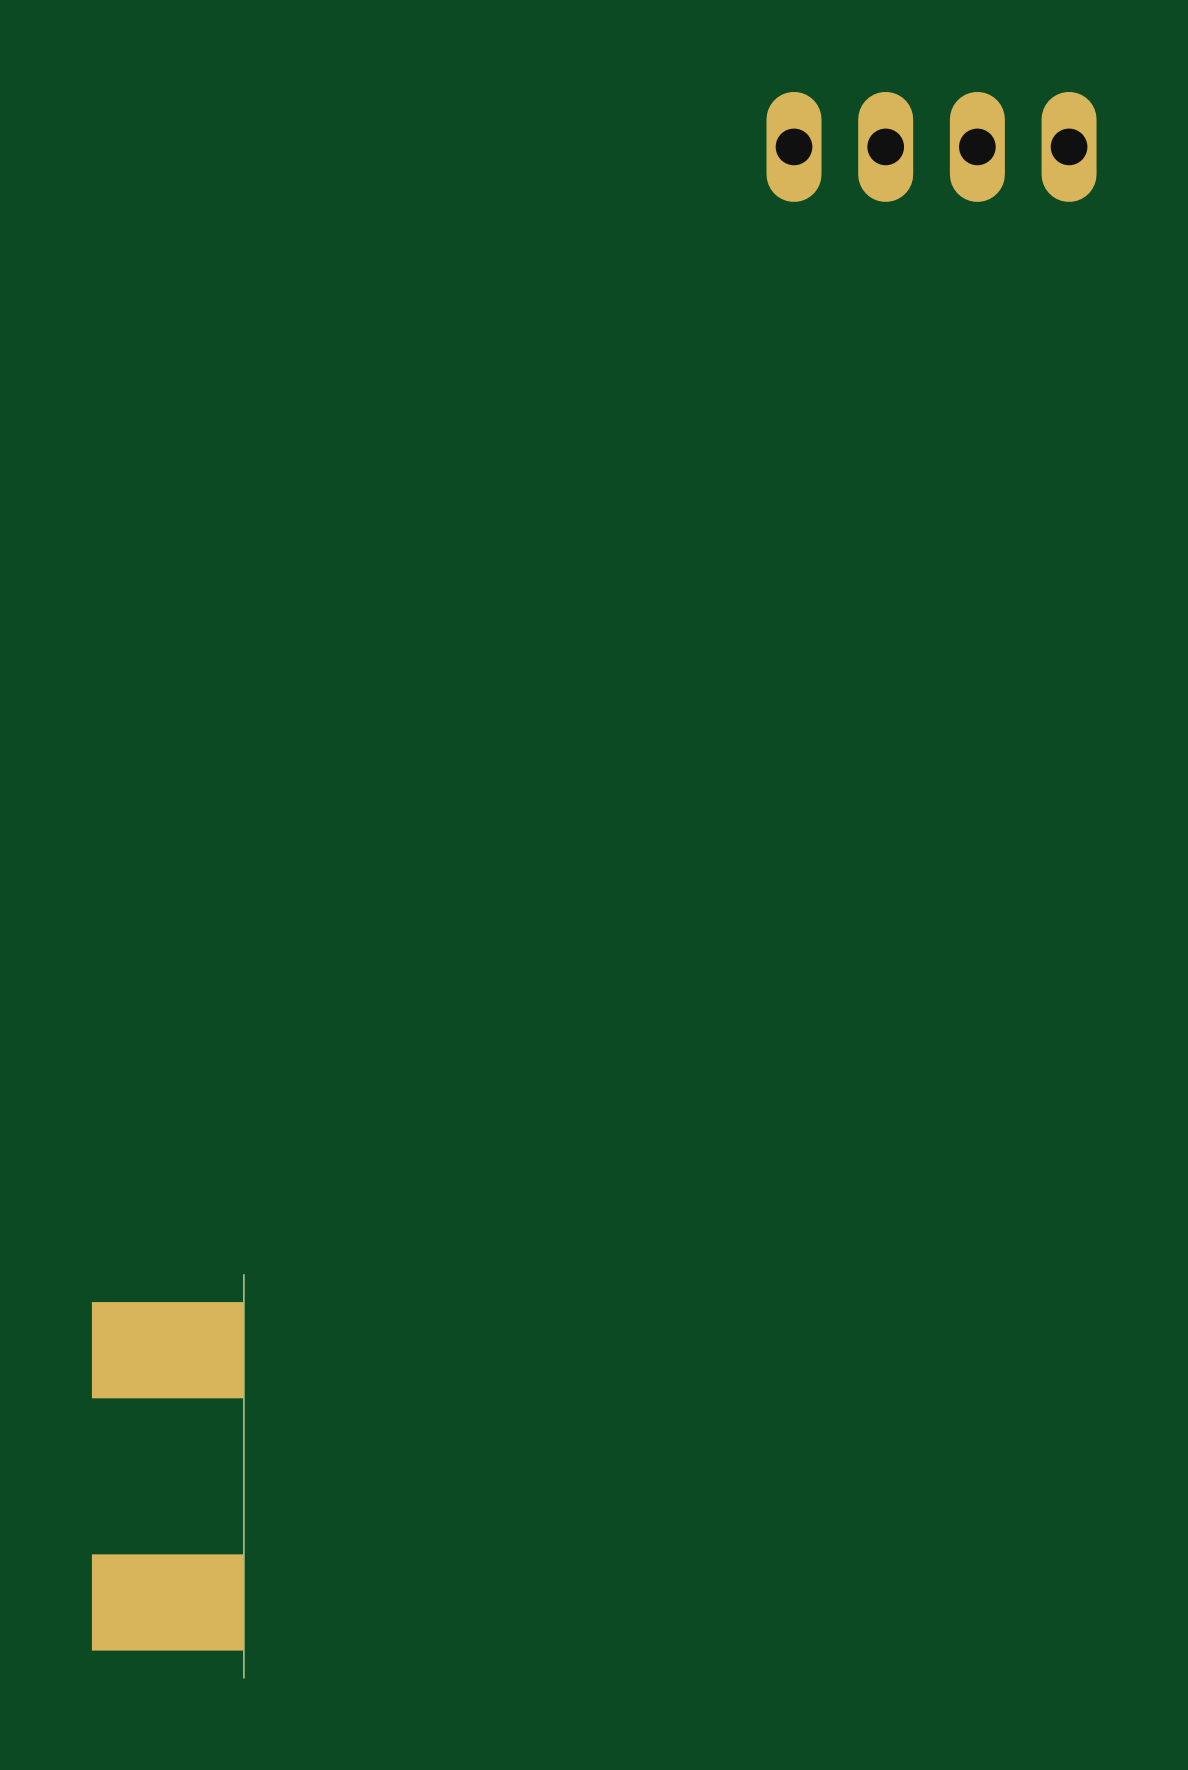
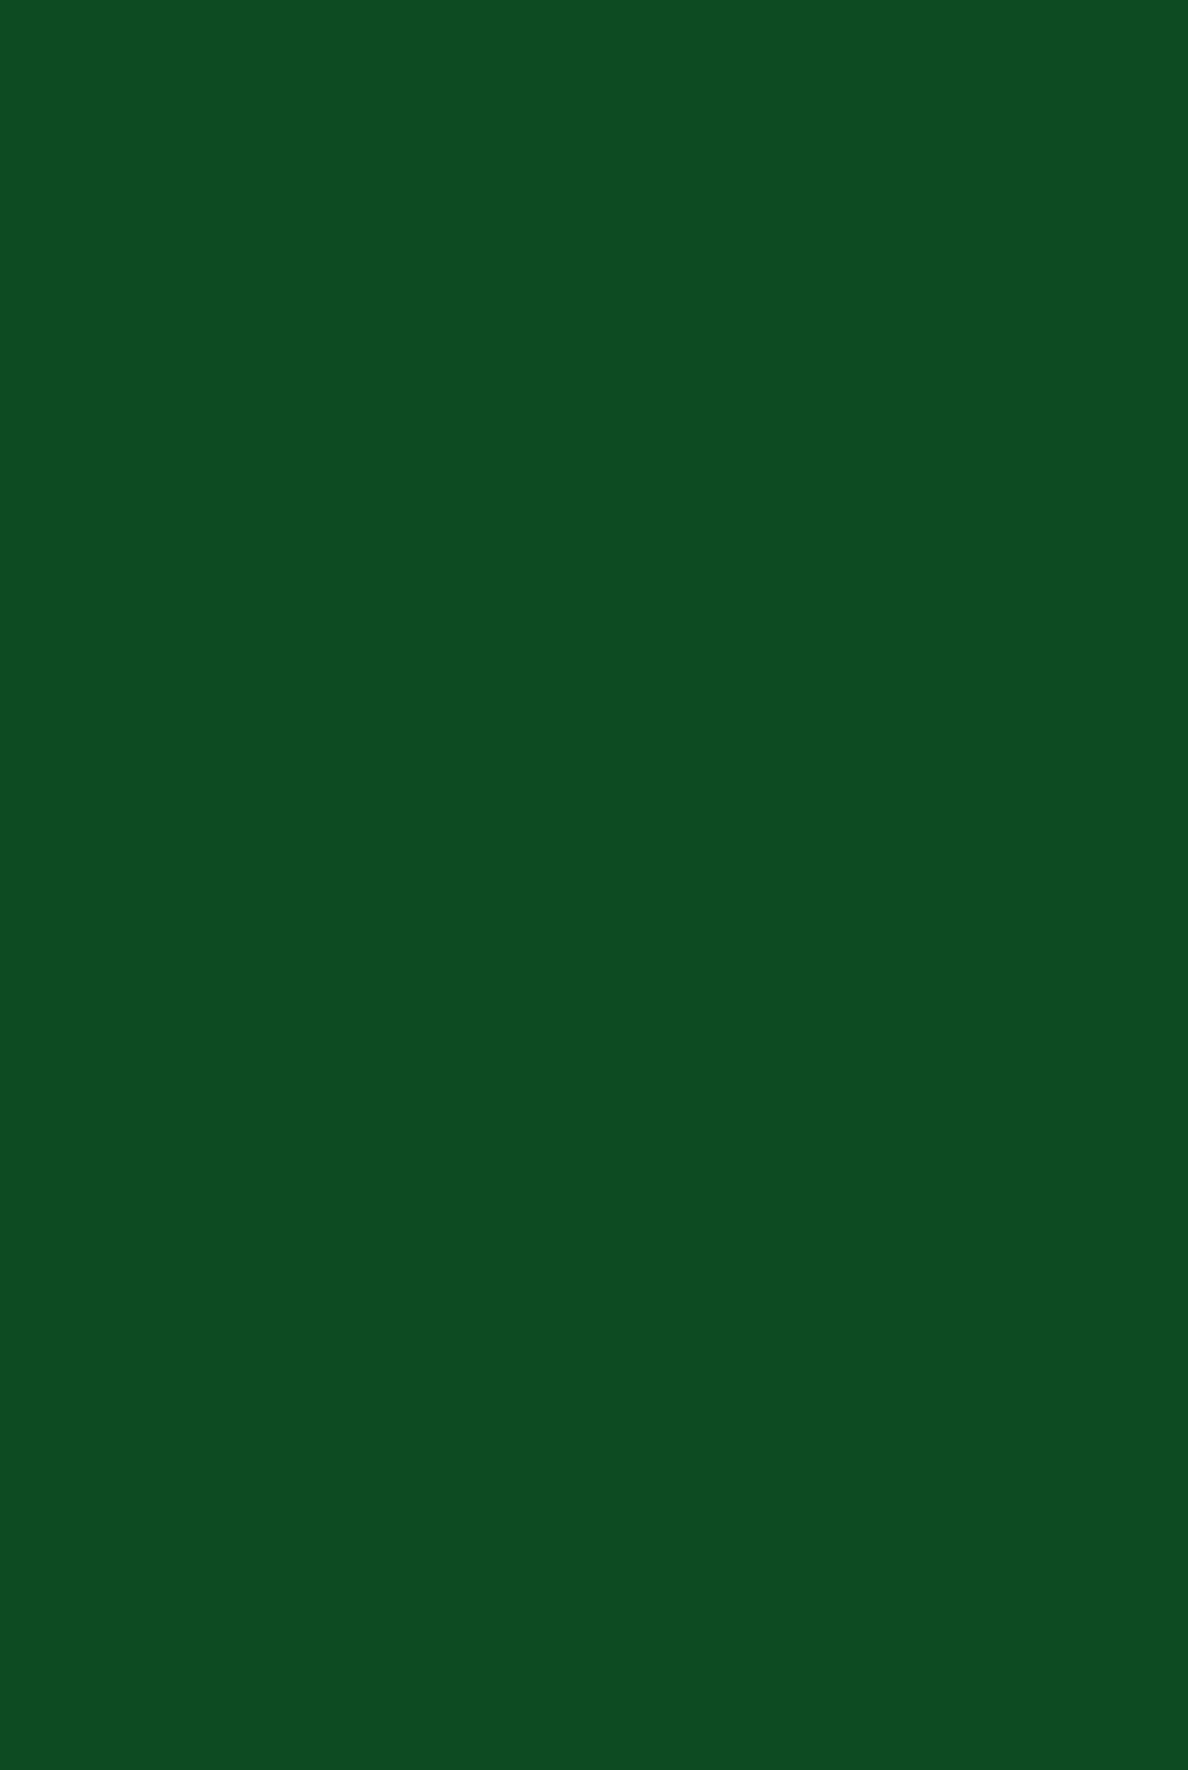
part: (931, 146) -> none
part: (167, 1476) -> none

